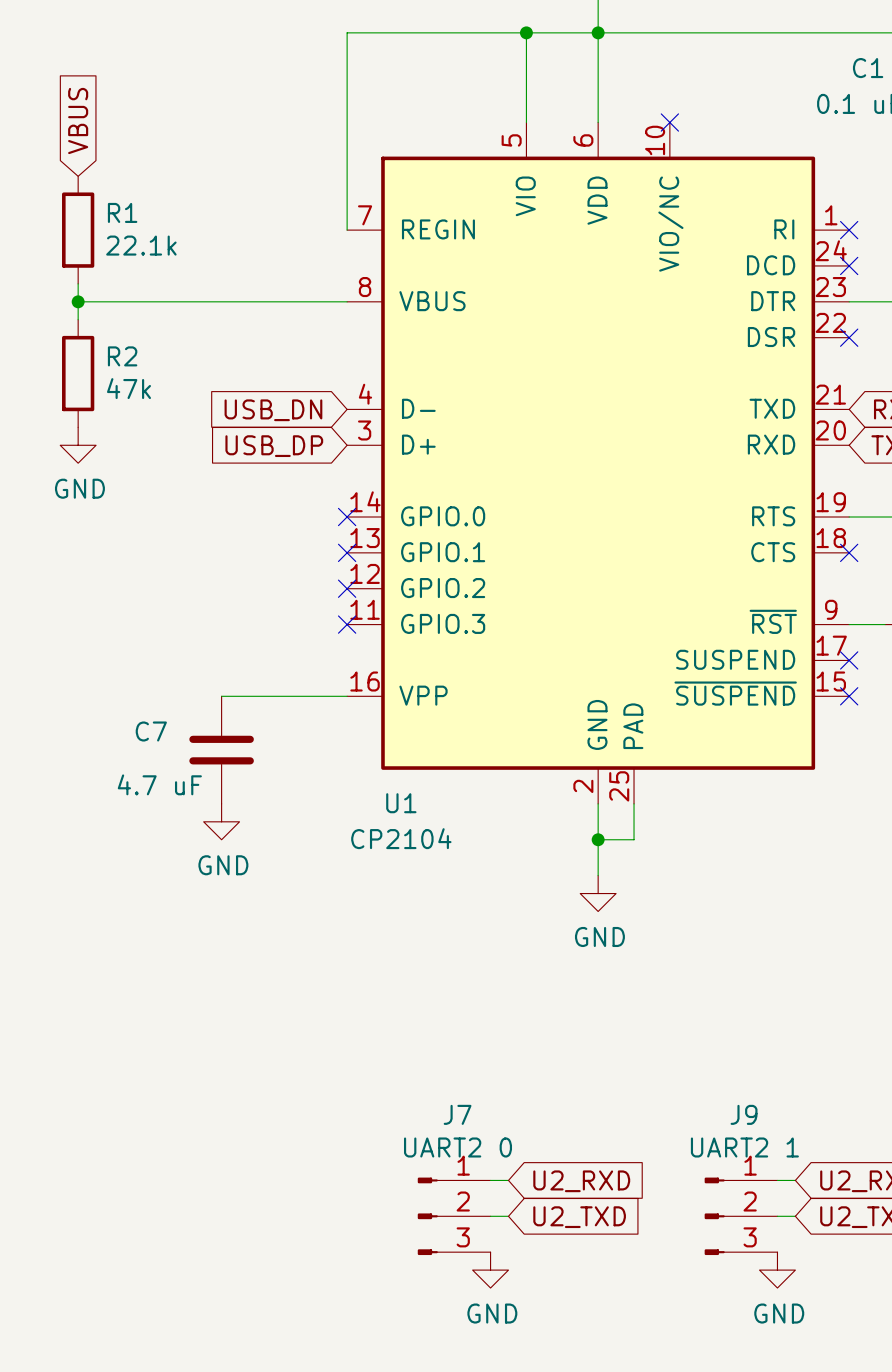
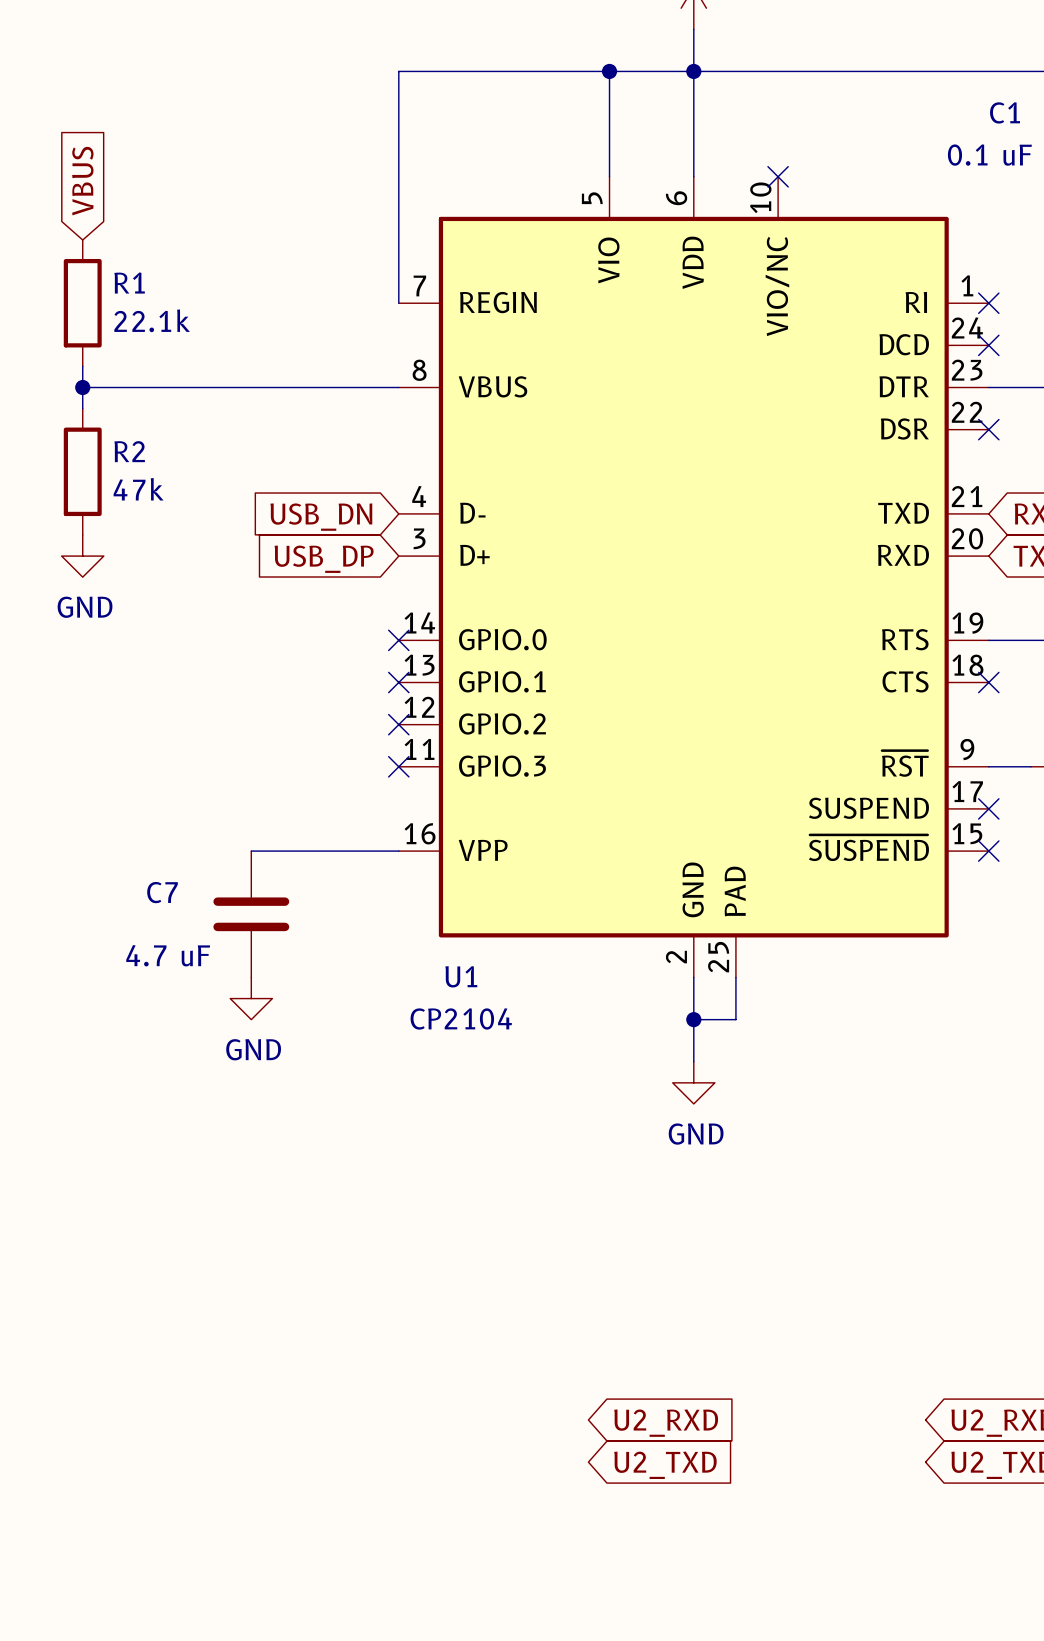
wire: (490, 1180) (508, 1180) -> none
wire: (777, 1180) (795, 1180) -> none
J7: UART2 0 (454, 1216) -> none
wire: (490, 1216) (508, 1216) -> none
J9: UART2 1 (741, 1216) -> none
wire: (777, 1216) (795, 1216) -> none
power symbol: GND (490, 1270) -> none
power symbol: GND (777, 1270) -> none

